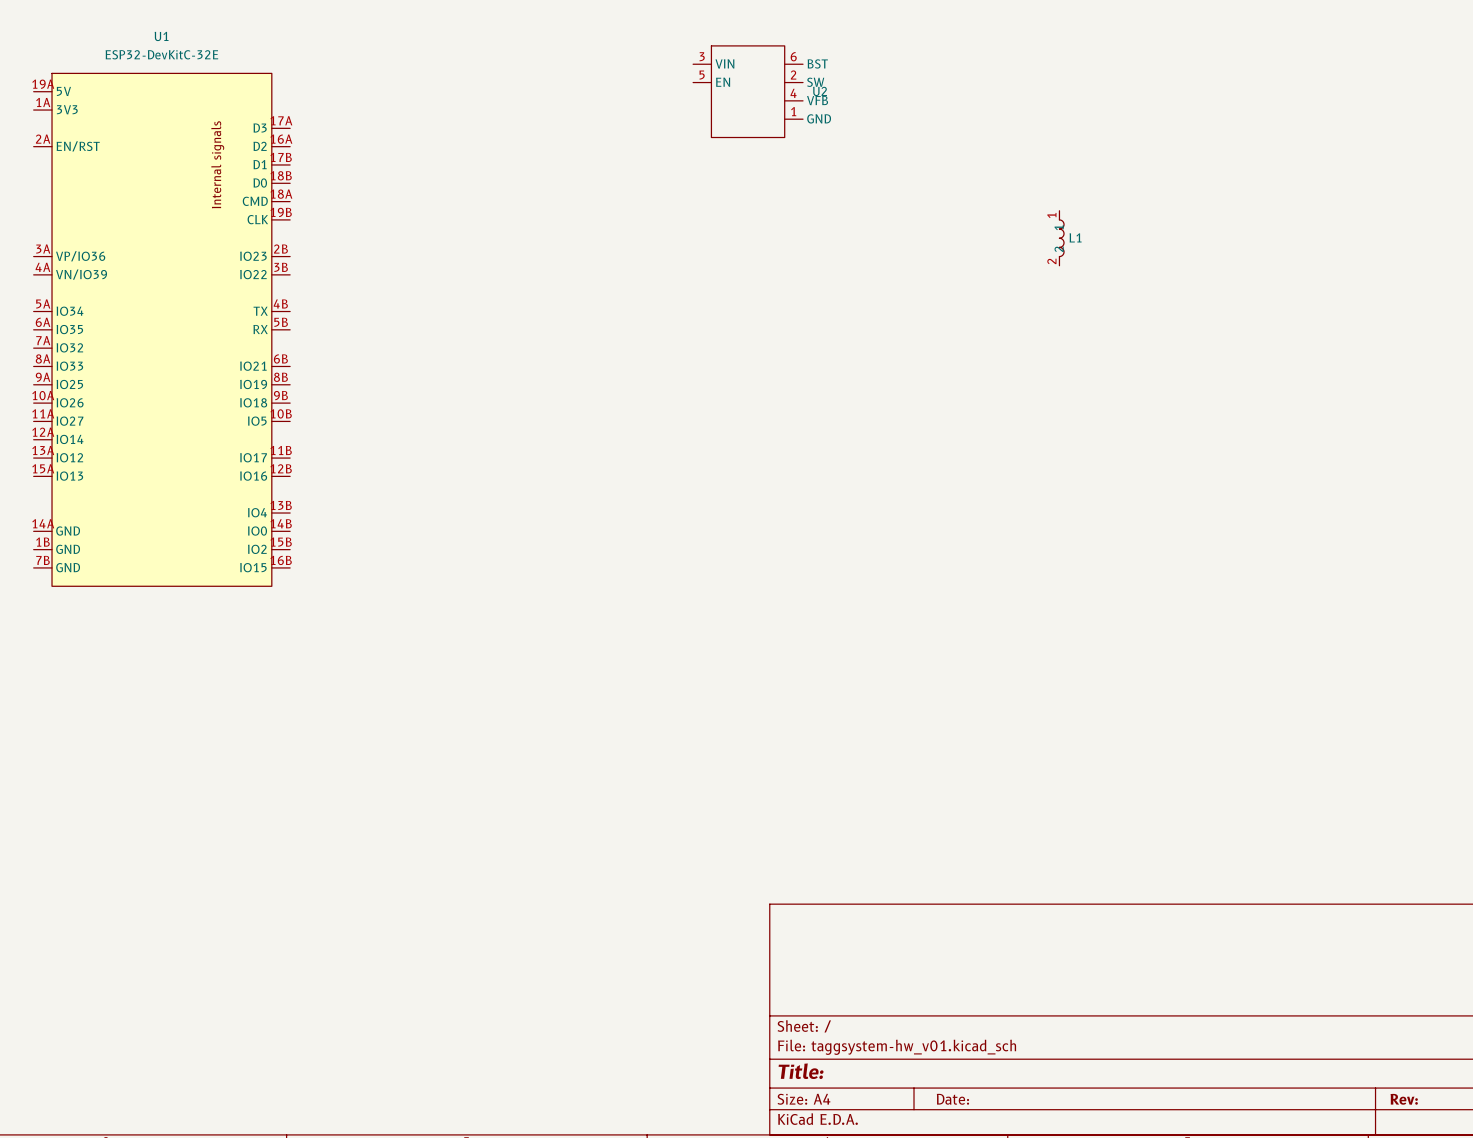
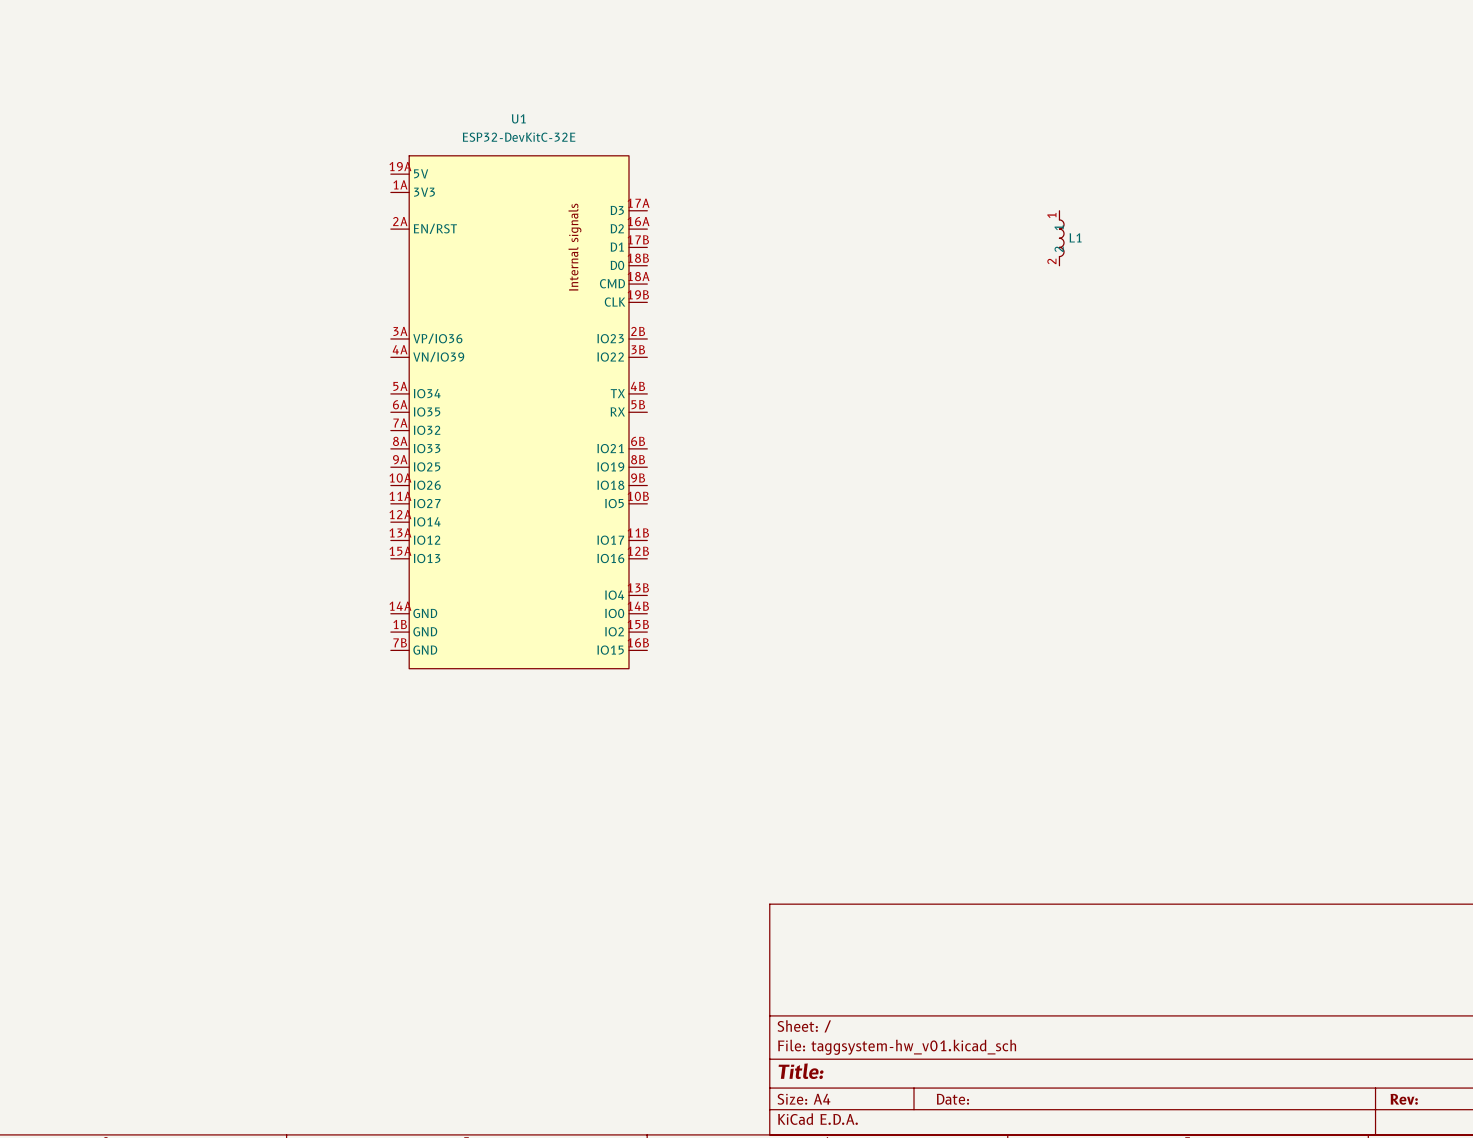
U2: (748, 91) -> none
U1 position: (161, 329) -> (519, 412)

